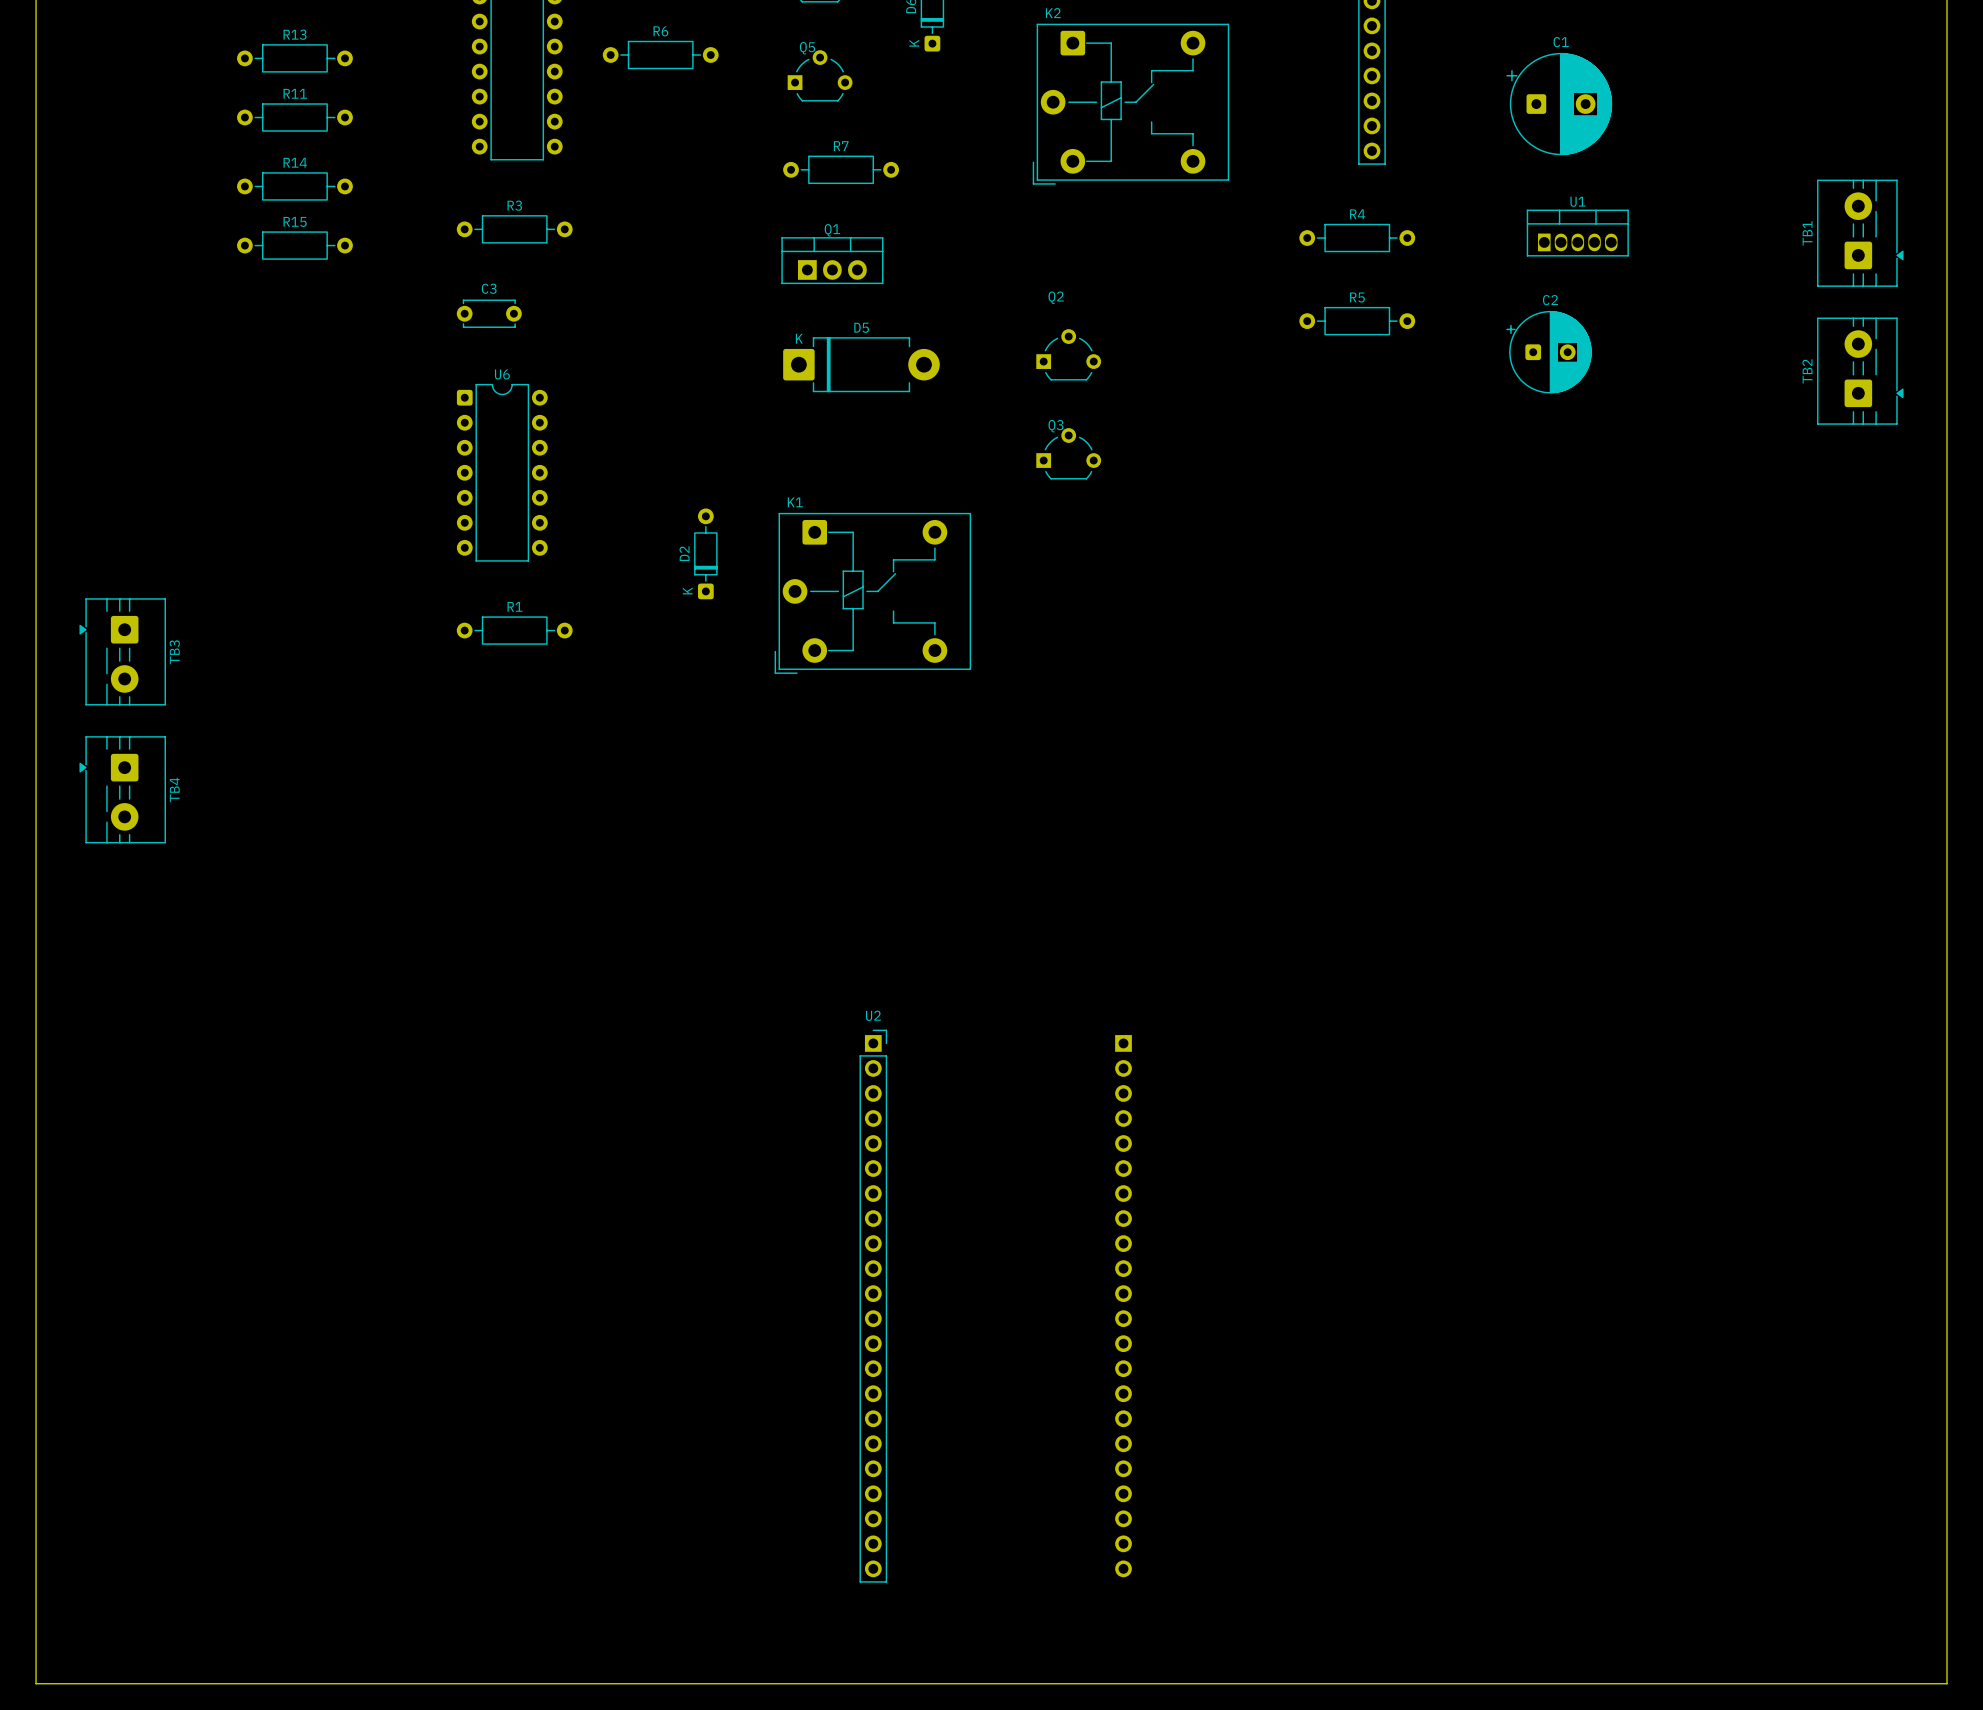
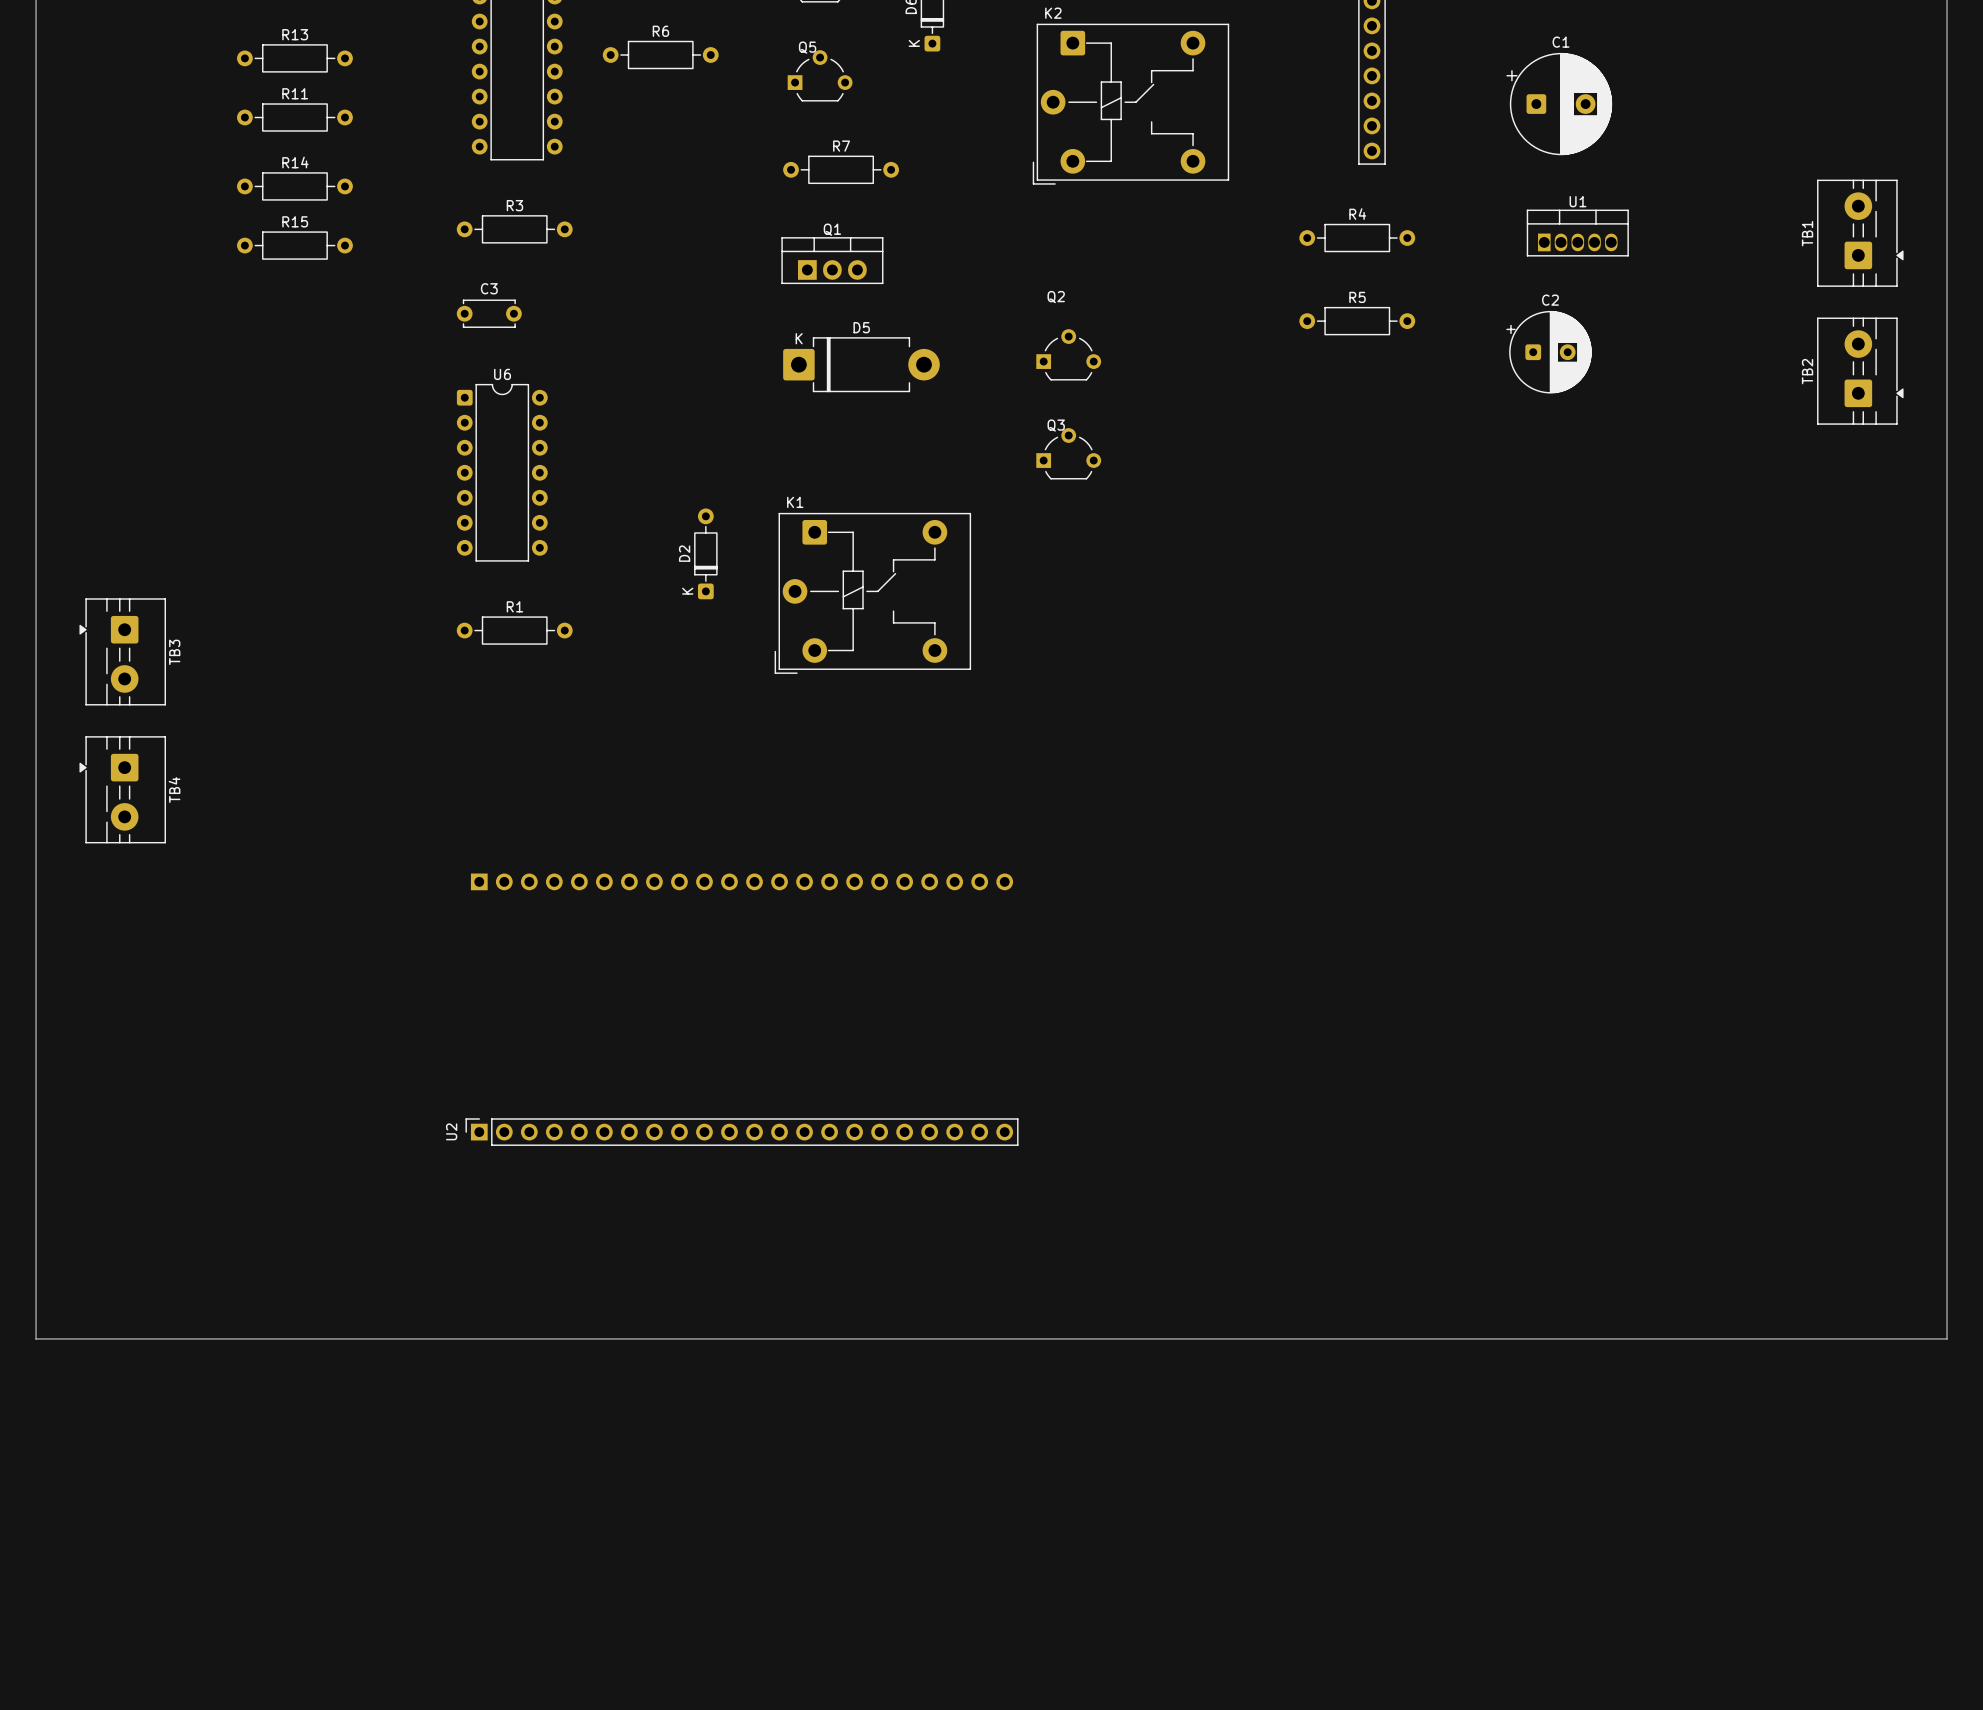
U2 rotation: 0° (995, 1306) -> 90° counterclockwise (742, 1009)
U2 position: (995, 1306) -> (742, 1009)
board edge: (36, 1338) (36, 1683) (1947, 1683) (1947, 1338) -> (36, 1338) (1947, 1338)

